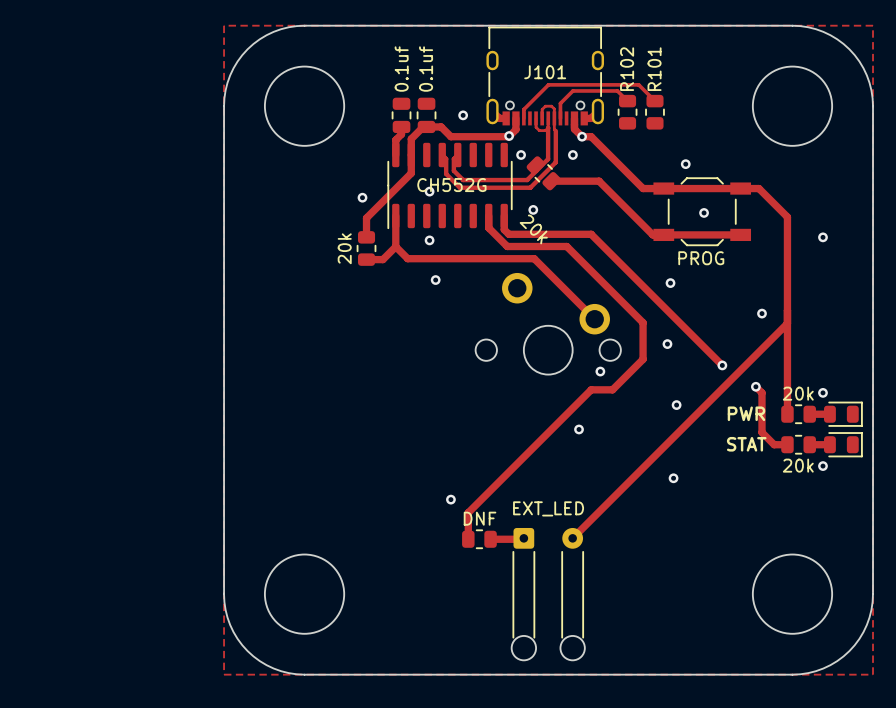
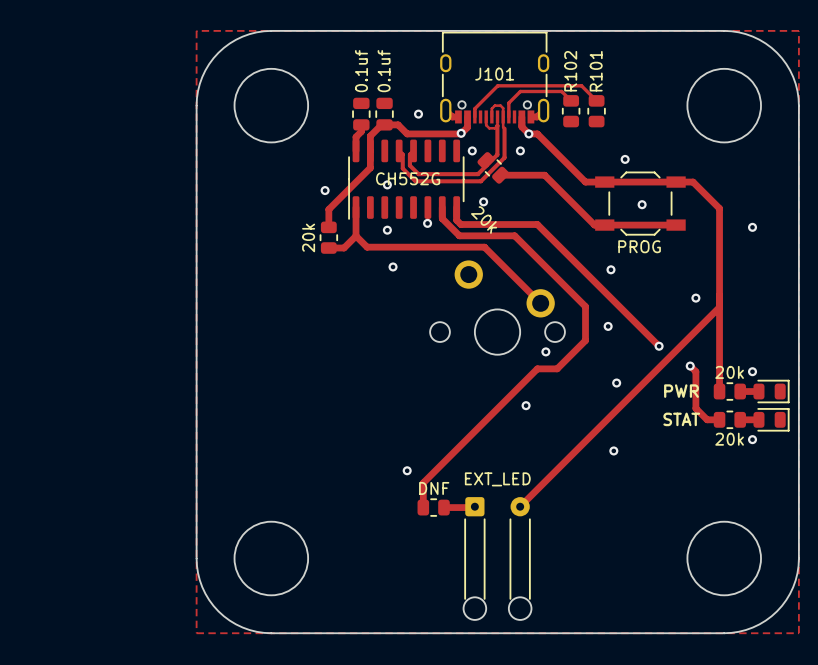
via: none -> (427, 223)

